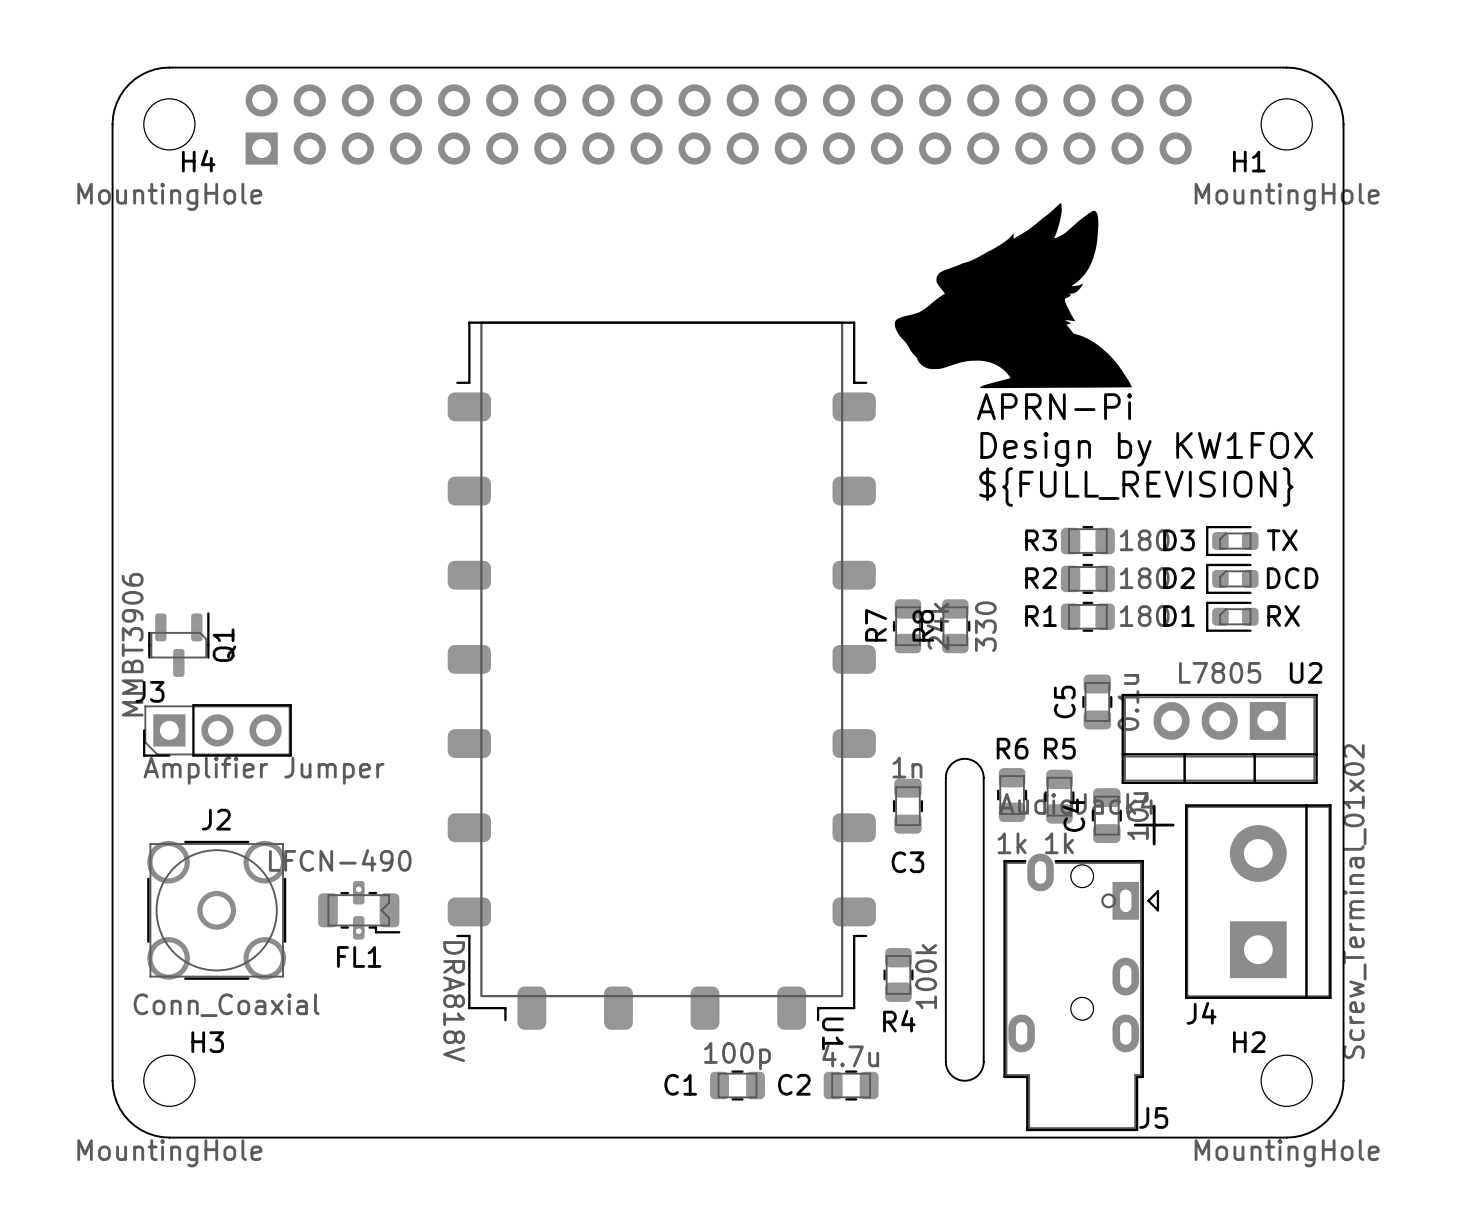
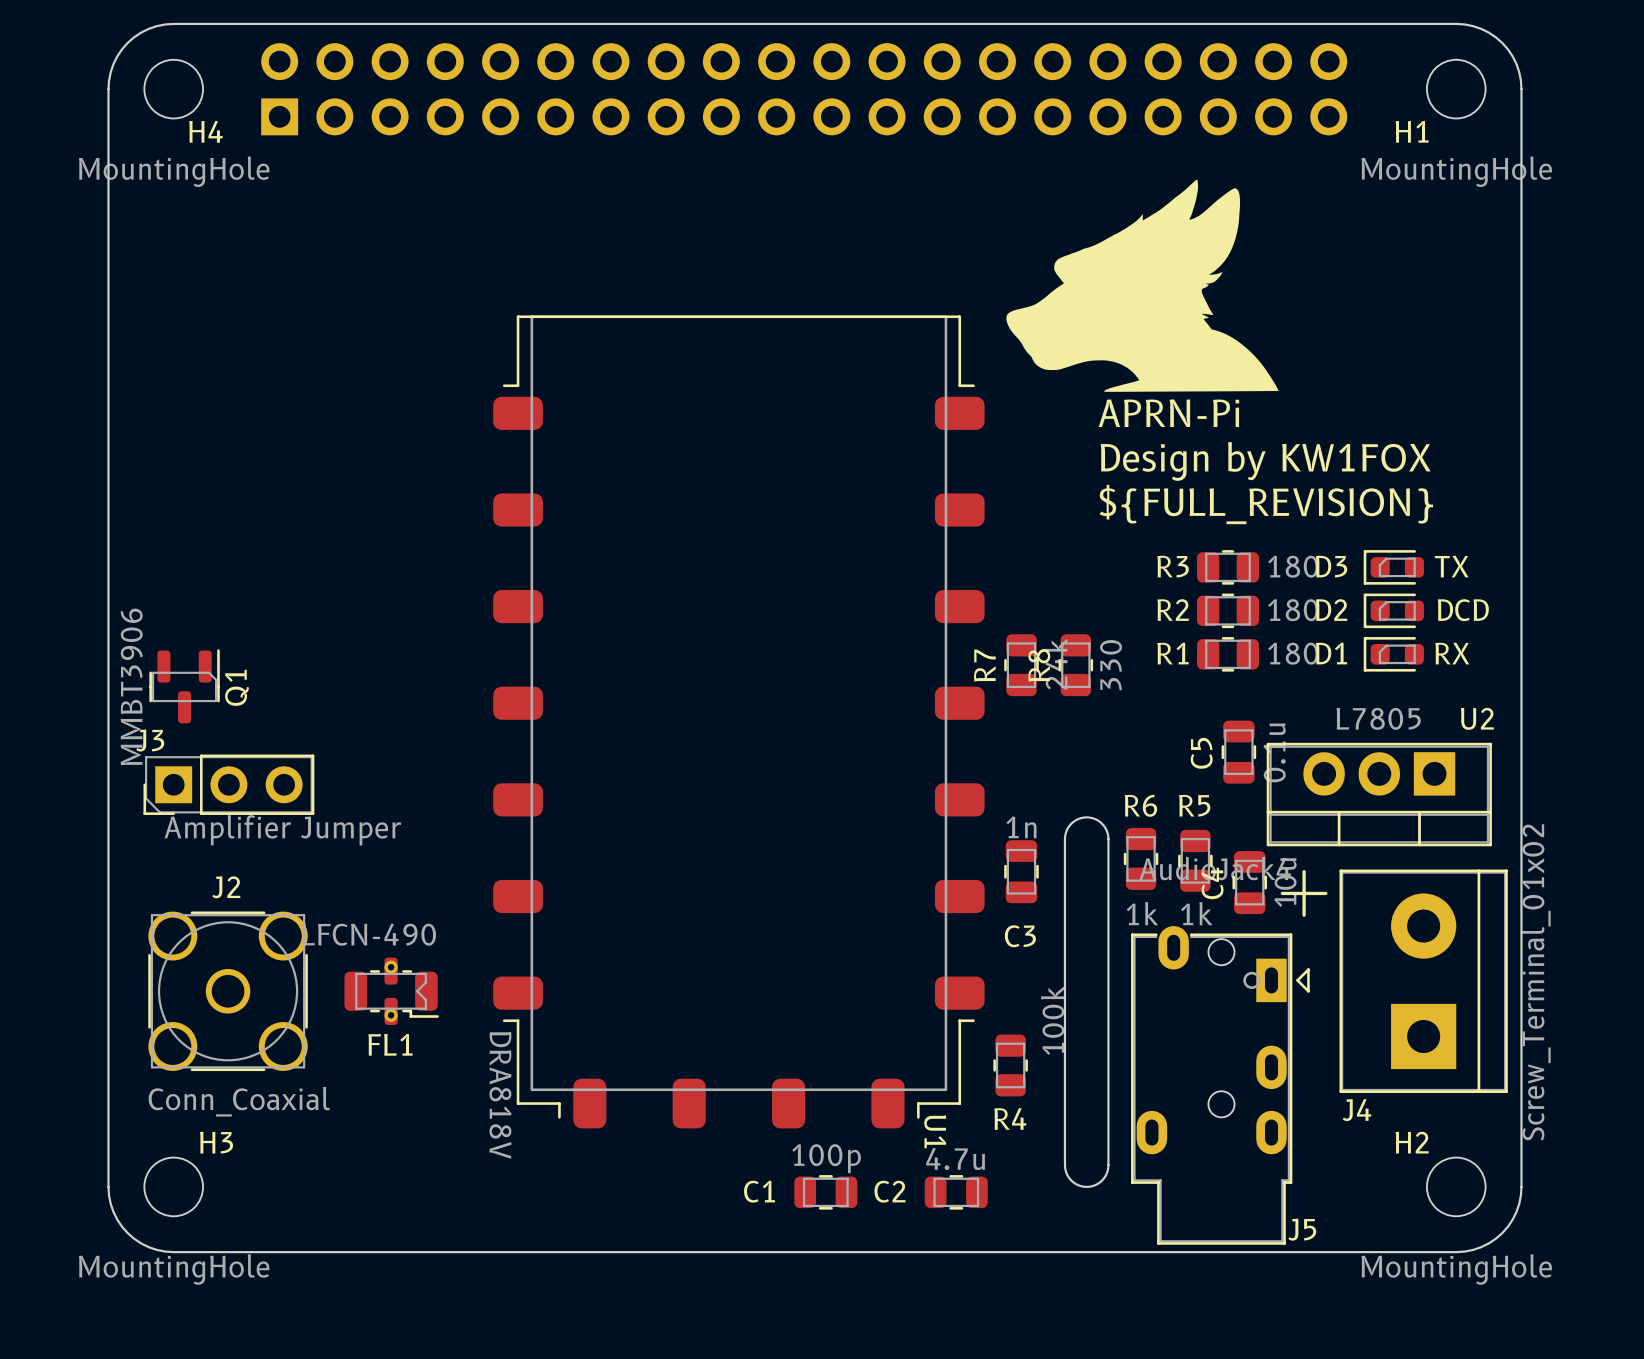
R4 value position: 100k (926, 976) -> 100k (1052, 1020)

